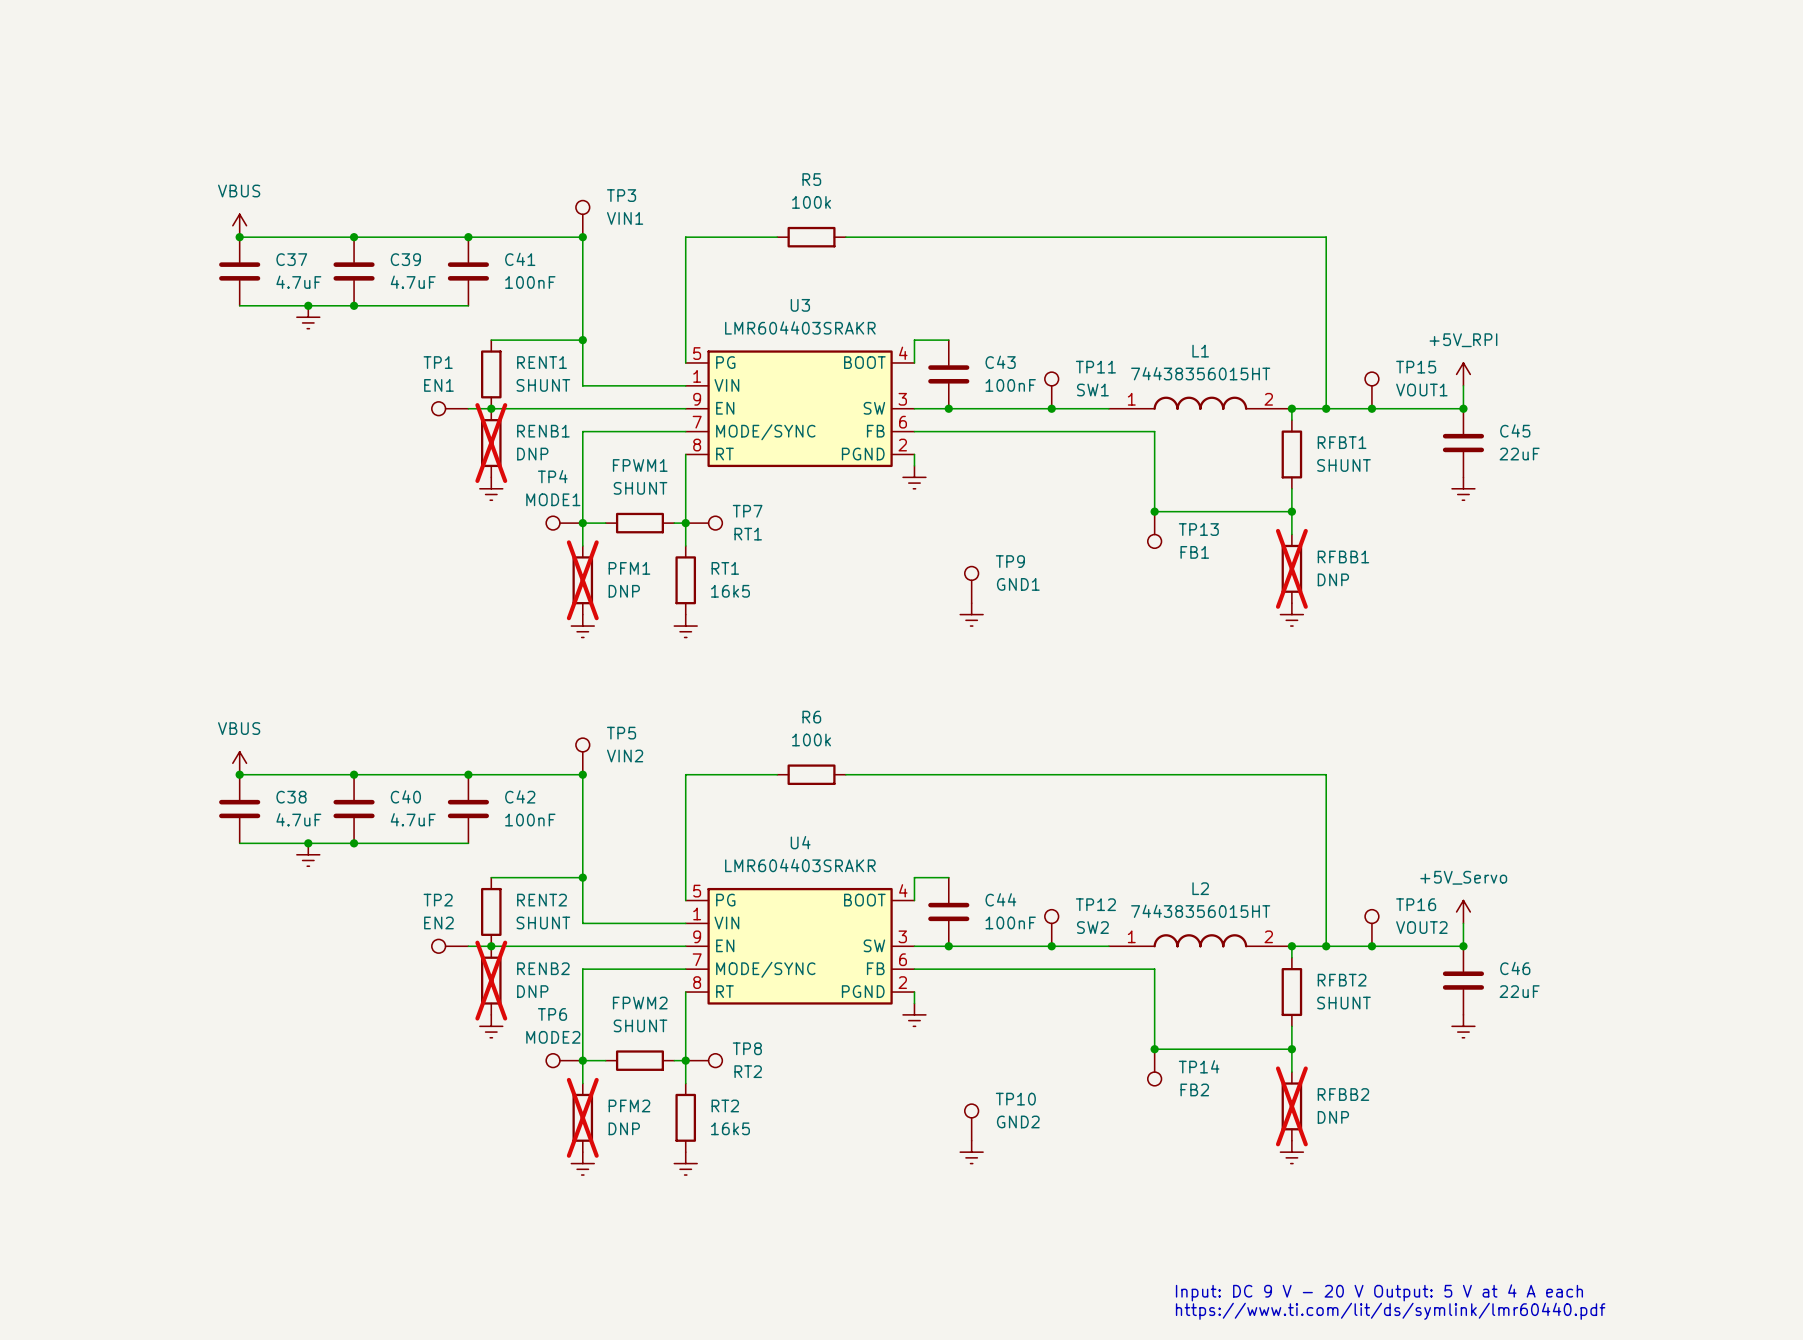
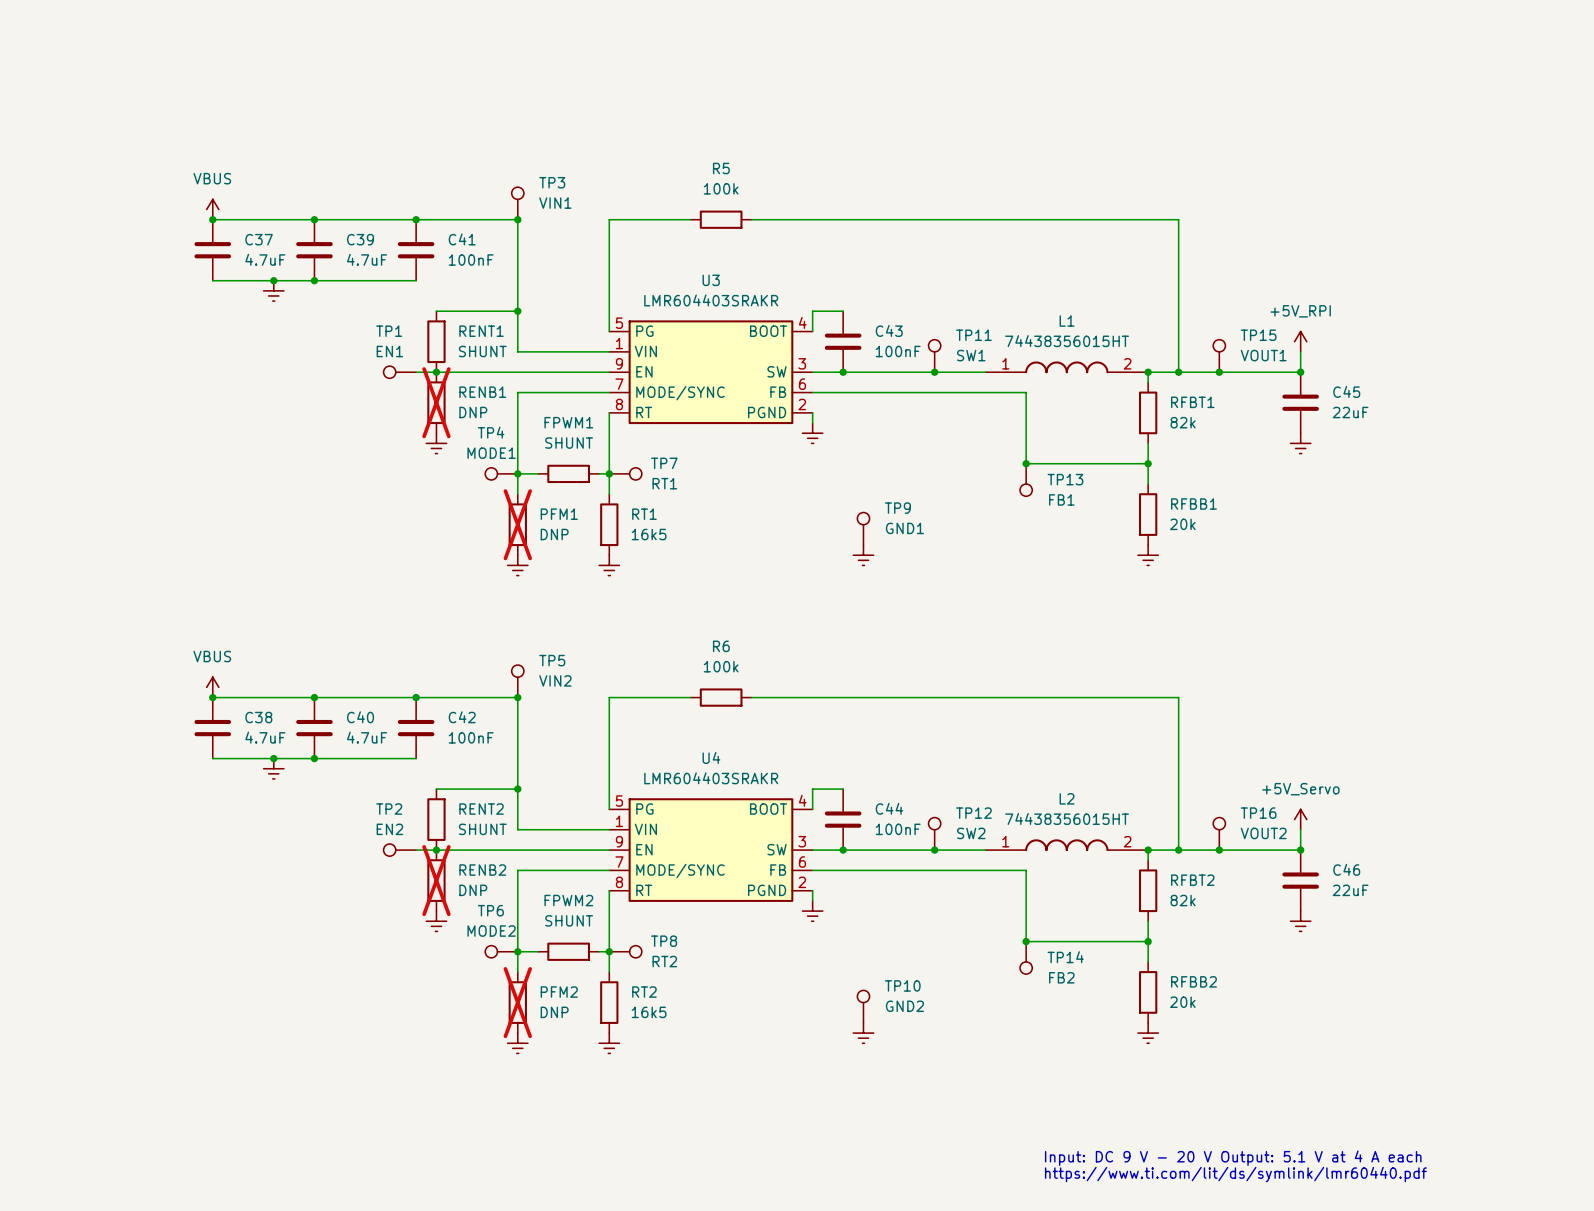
RFBT1 value: SHUNT (1343, 465) -> 82k (1183, 422)
RFBB1 do-not-place cross: (1291, 568) -> none
RFBB1 value: DNP (1333, 579) -> 20k (1182, 524)
RFBT2 value: SHUNT (1343, 1003) -> 82k (1183, 900)
RFBB2 do-not-place cross: (1291, 1106) -> none
RFBB2 value: DNP (1333, 1117) -> 20k (1182, 1002)
text: Input: DC 9 V - 20 V Output: 5 V at 4 A each (1379, 1292) -> Input: DC 9 V - 20 V Output: 5.1 V at 4 A each (1233, 1158)

